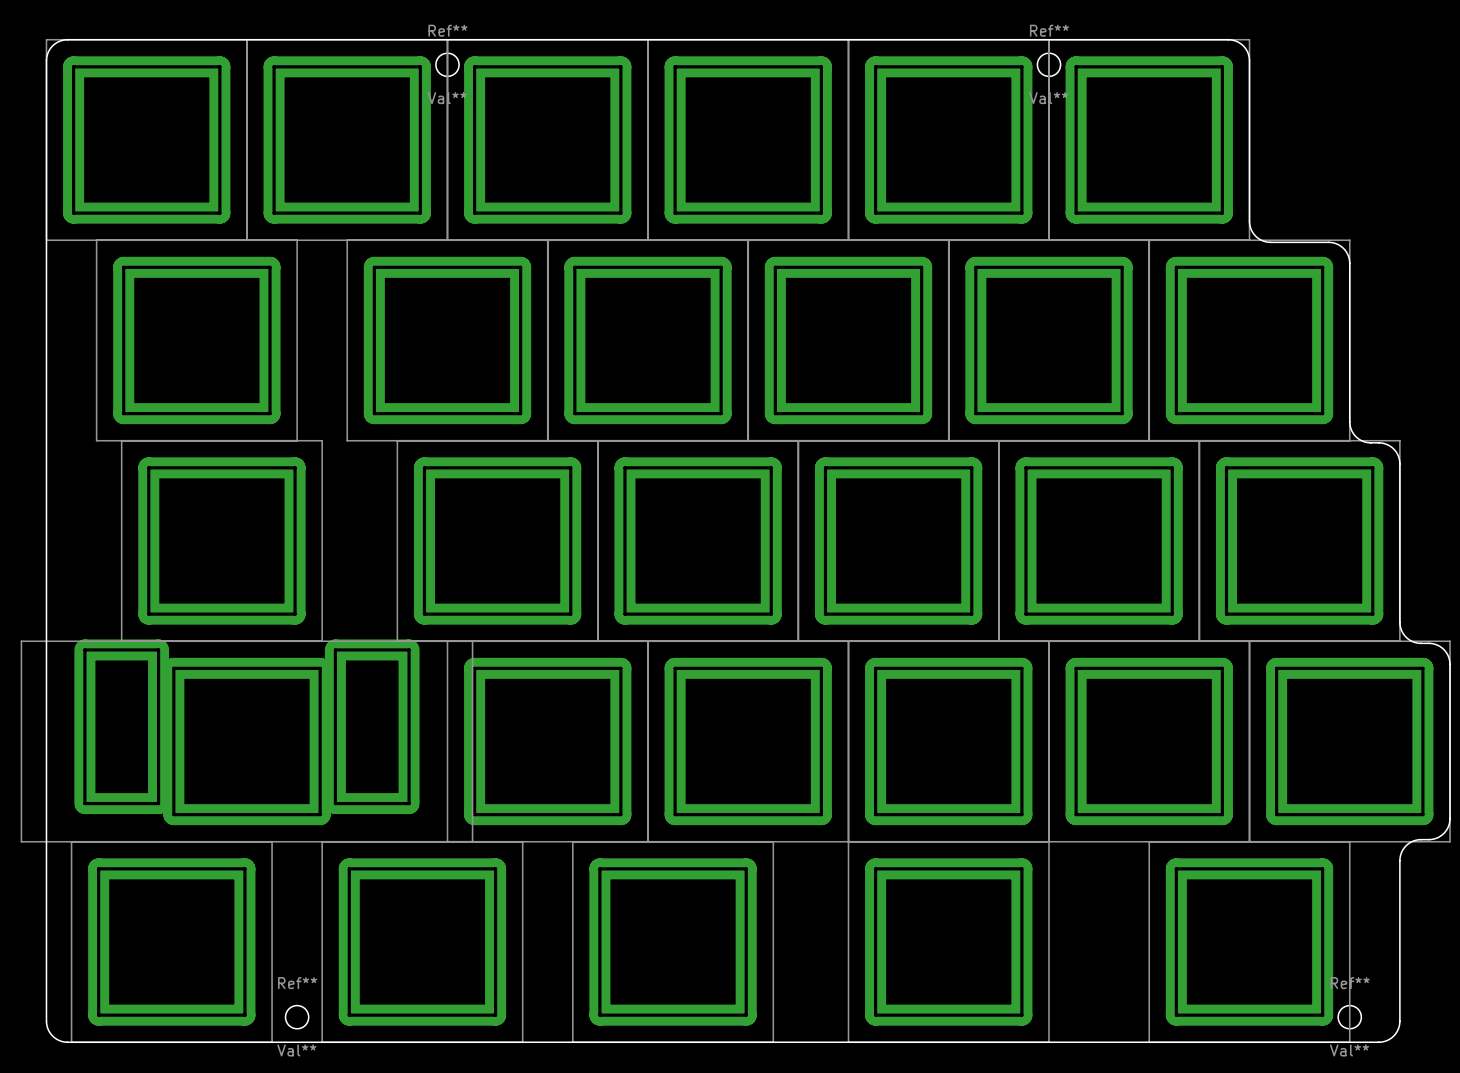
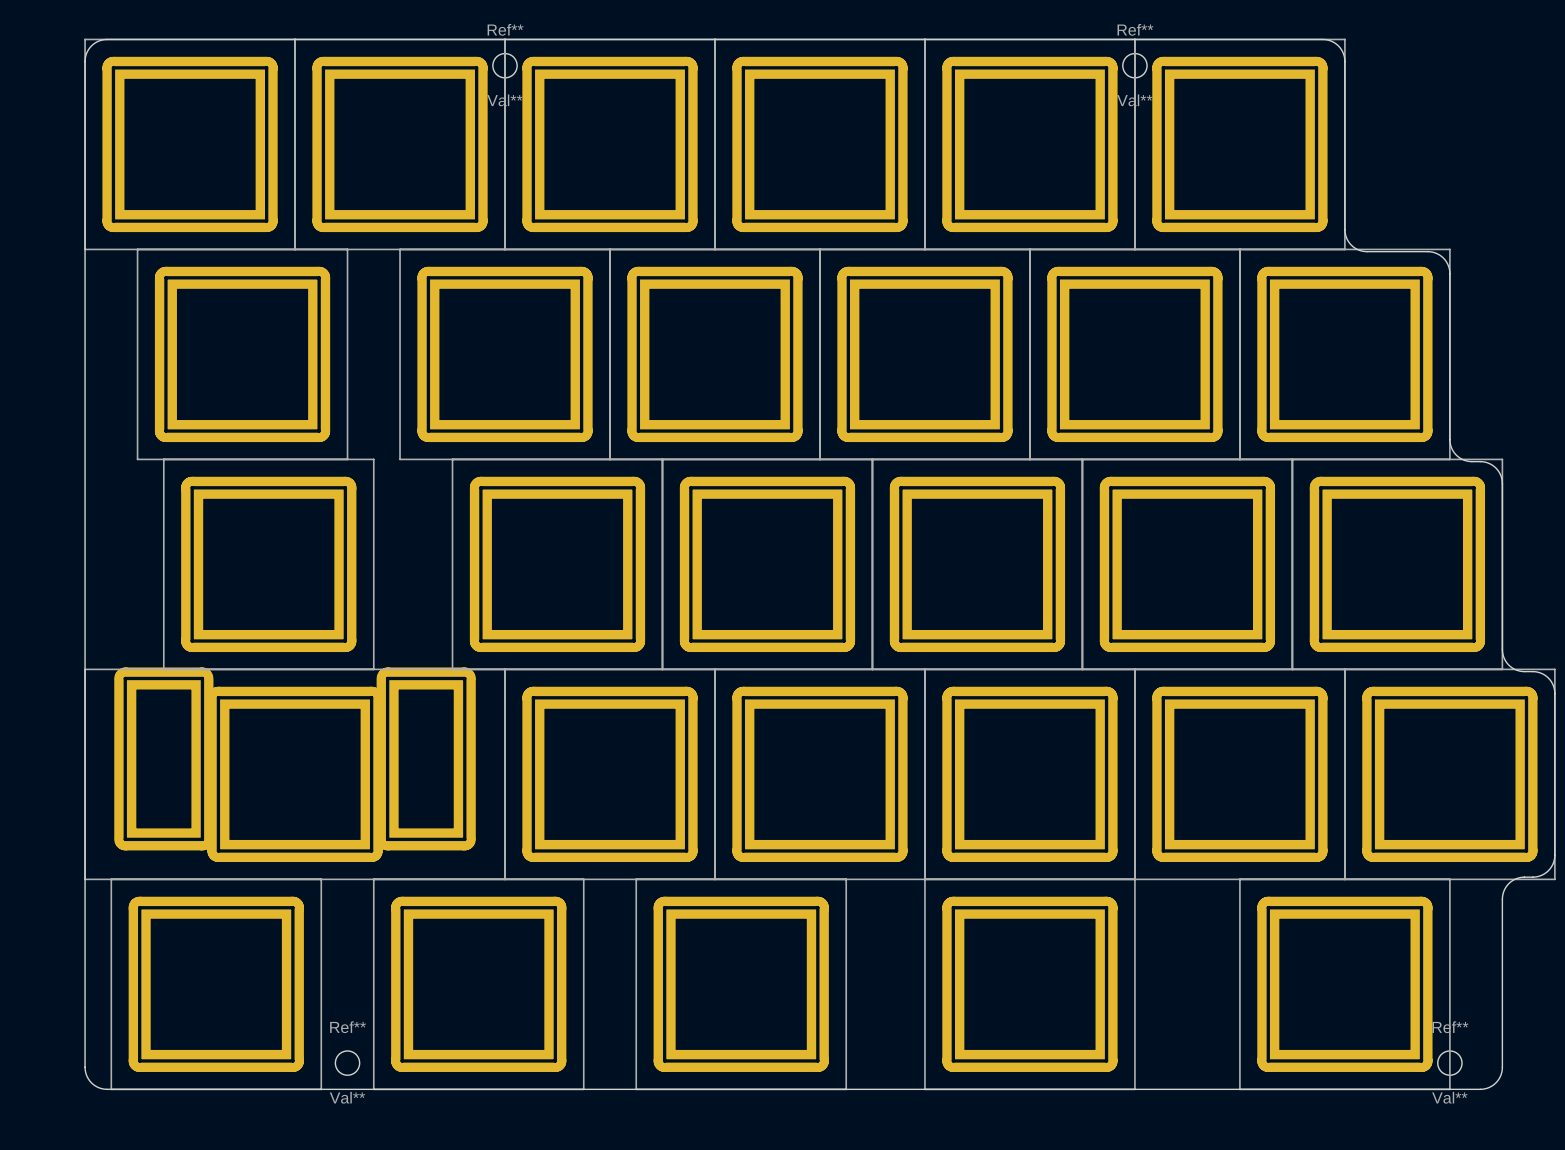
part footprint: [20, 639, 474, 843] -> [84, 667, 506, 881]

